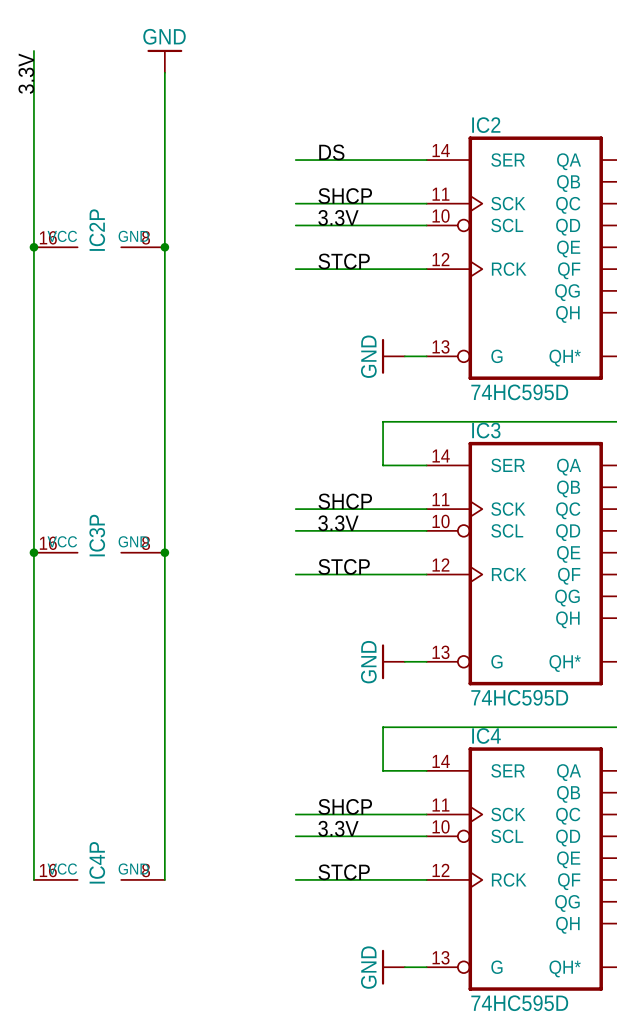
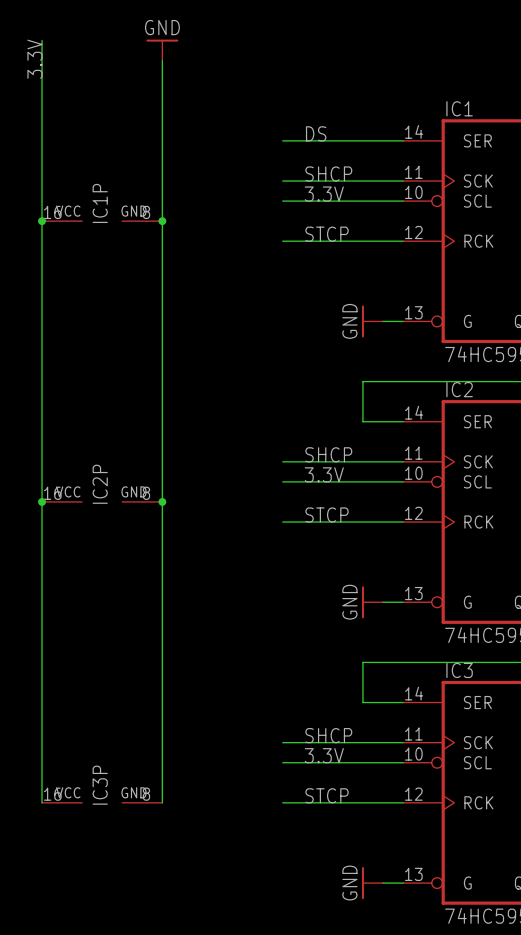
IC2 name: IC2 (486, 125) -> IC1 (459, 108)
IC2P name: IC2P (97, 230) -> IC1P (100, 203)
IC3 name: IC3 (486, 430) -> IC2 (459, 389)
IC3P name: IC3P (97, 535) -> IC2P (100, 484)
IC4 name: IC4 (486, 735) -> IC3 (459, 670)
IC4P name: IC4P (97, 862) -> IC3P (100, 785)

